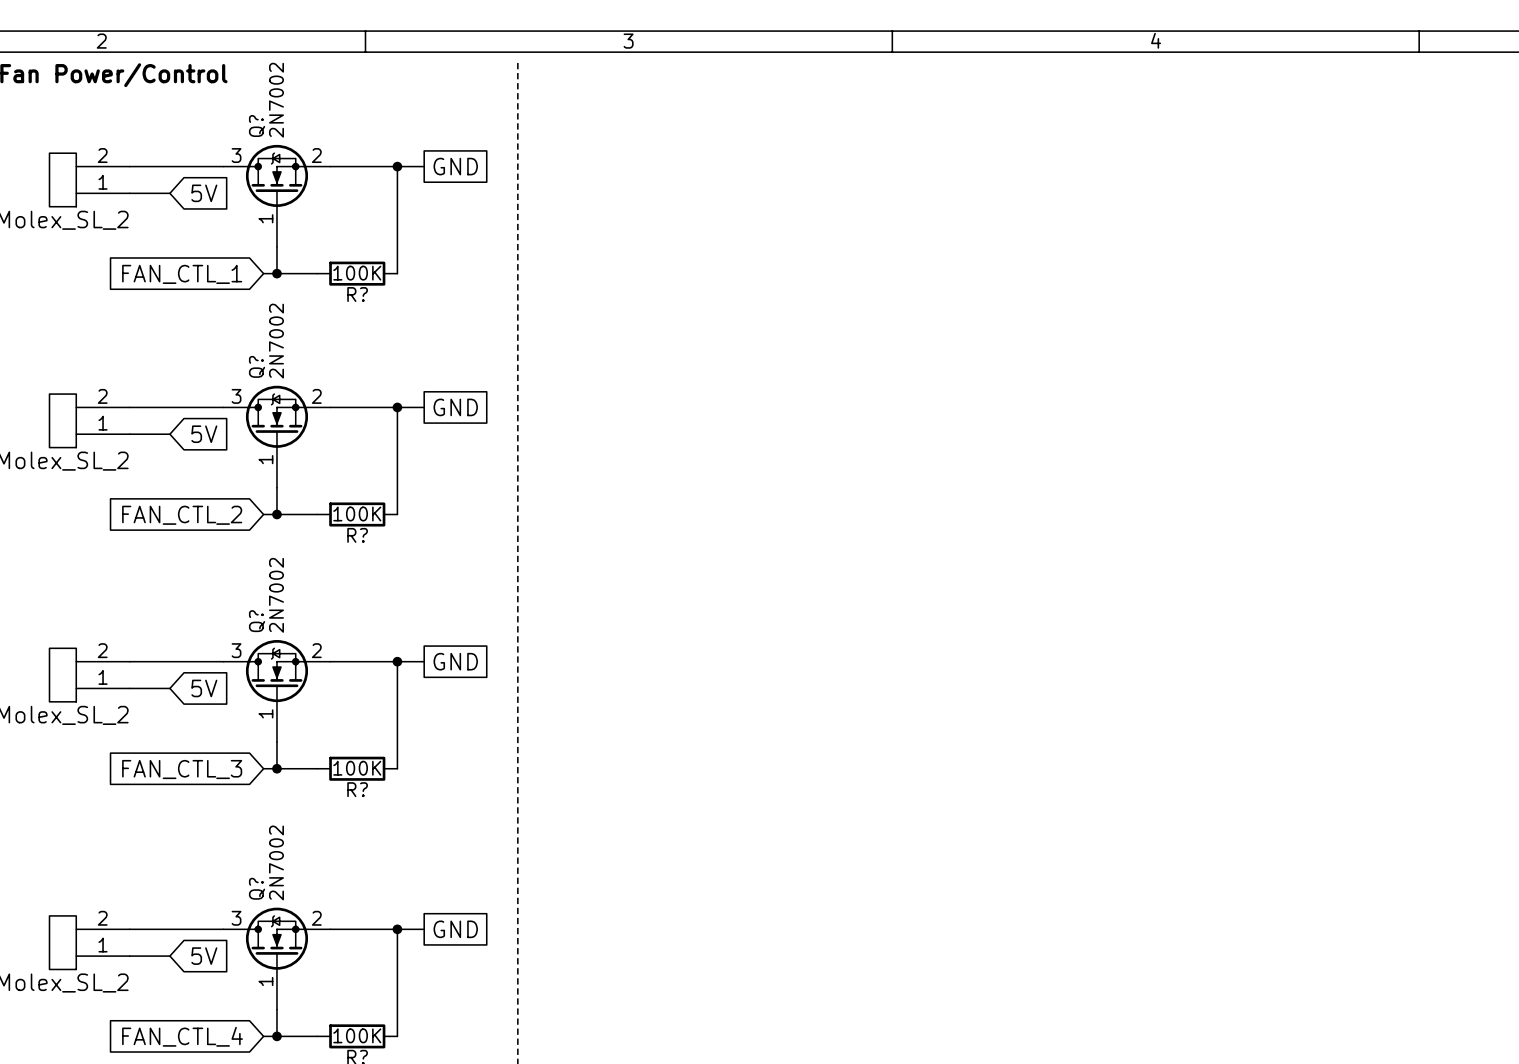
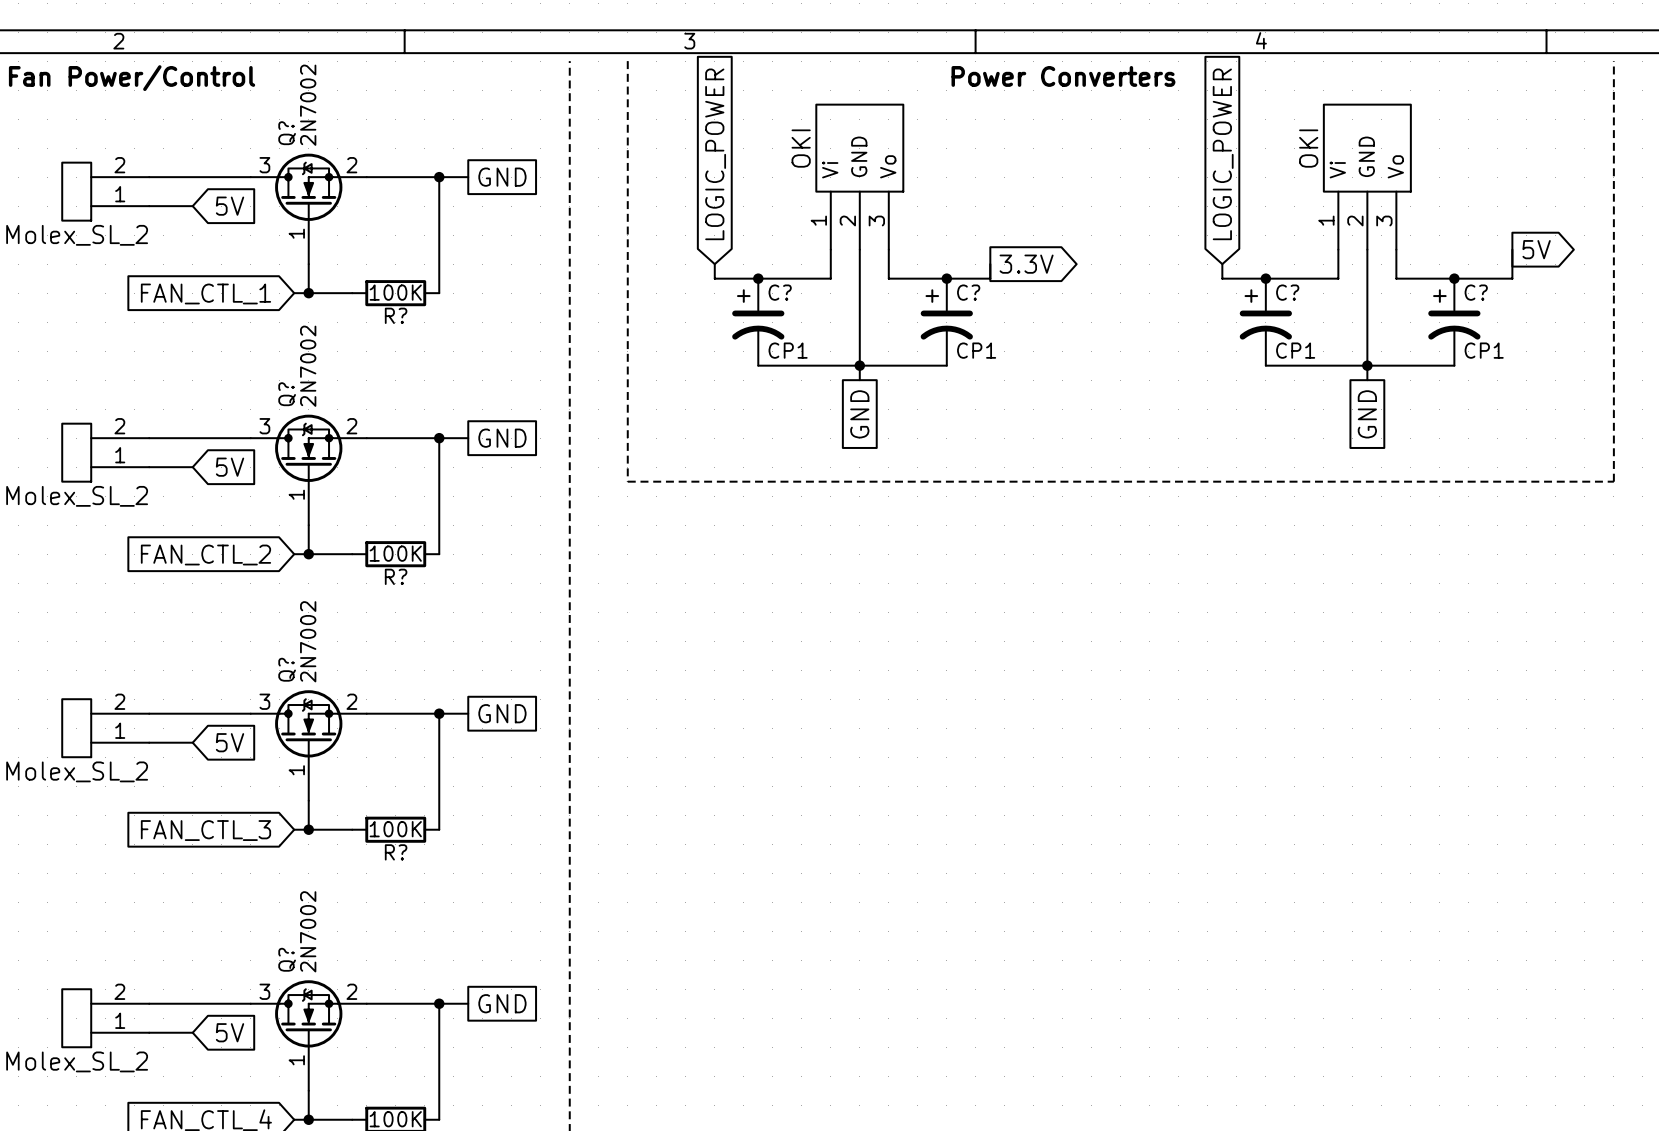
line: none -> (627, 61) (627, 481) (1613, 481) (1613, 61)
text: none -> Power Converters (1063, 76)
global label: none -> LOGIC_POWER (715, 154)
global label: none -> LOGIC_POWER (1223, 154)
part: none -> OKI (859, 177)
part: none -> OKI (1367, 177)
wire: none -> (830, 249) (830, 278) (714, 278) (714, 264)
wire: none -> (859, 249) (859, 380)
wire: none -> (888, 249) (888, 278) (990, 278) (990, 264)
wire: none -> (1338, 249) (1338, 278) (1222, 278) (1222, 264)
wire: none -> (1367, 249) (1367, 380)
wire: none -> (1396, 249) (1396, 278) (1512, 278) (1512, 249)
global label: none -> 5V (1536, 249)
global label: none -> 3.3V (1026, 264)
junction: none -> (758, 278)
junction: none -> (946, 278)
junction: none -> (1265, 278)
junction: none -> (1454, 278)
C?: none -> CP1 (758, 322)
C?: none -> CP1 (946, 322)
C?: none -> CP1 (1265, 322)
C?: none -> CP1 (1454, 322)
wire: none -> (758, 365) (946, 365)
junction: none -> (859, 365)
wire: none -> (1265, 365) (1454, 365)
junction: none -> (1367, 365)
global label: none -> GND (859, 414)
global label: none -> GND (1367, 414)

